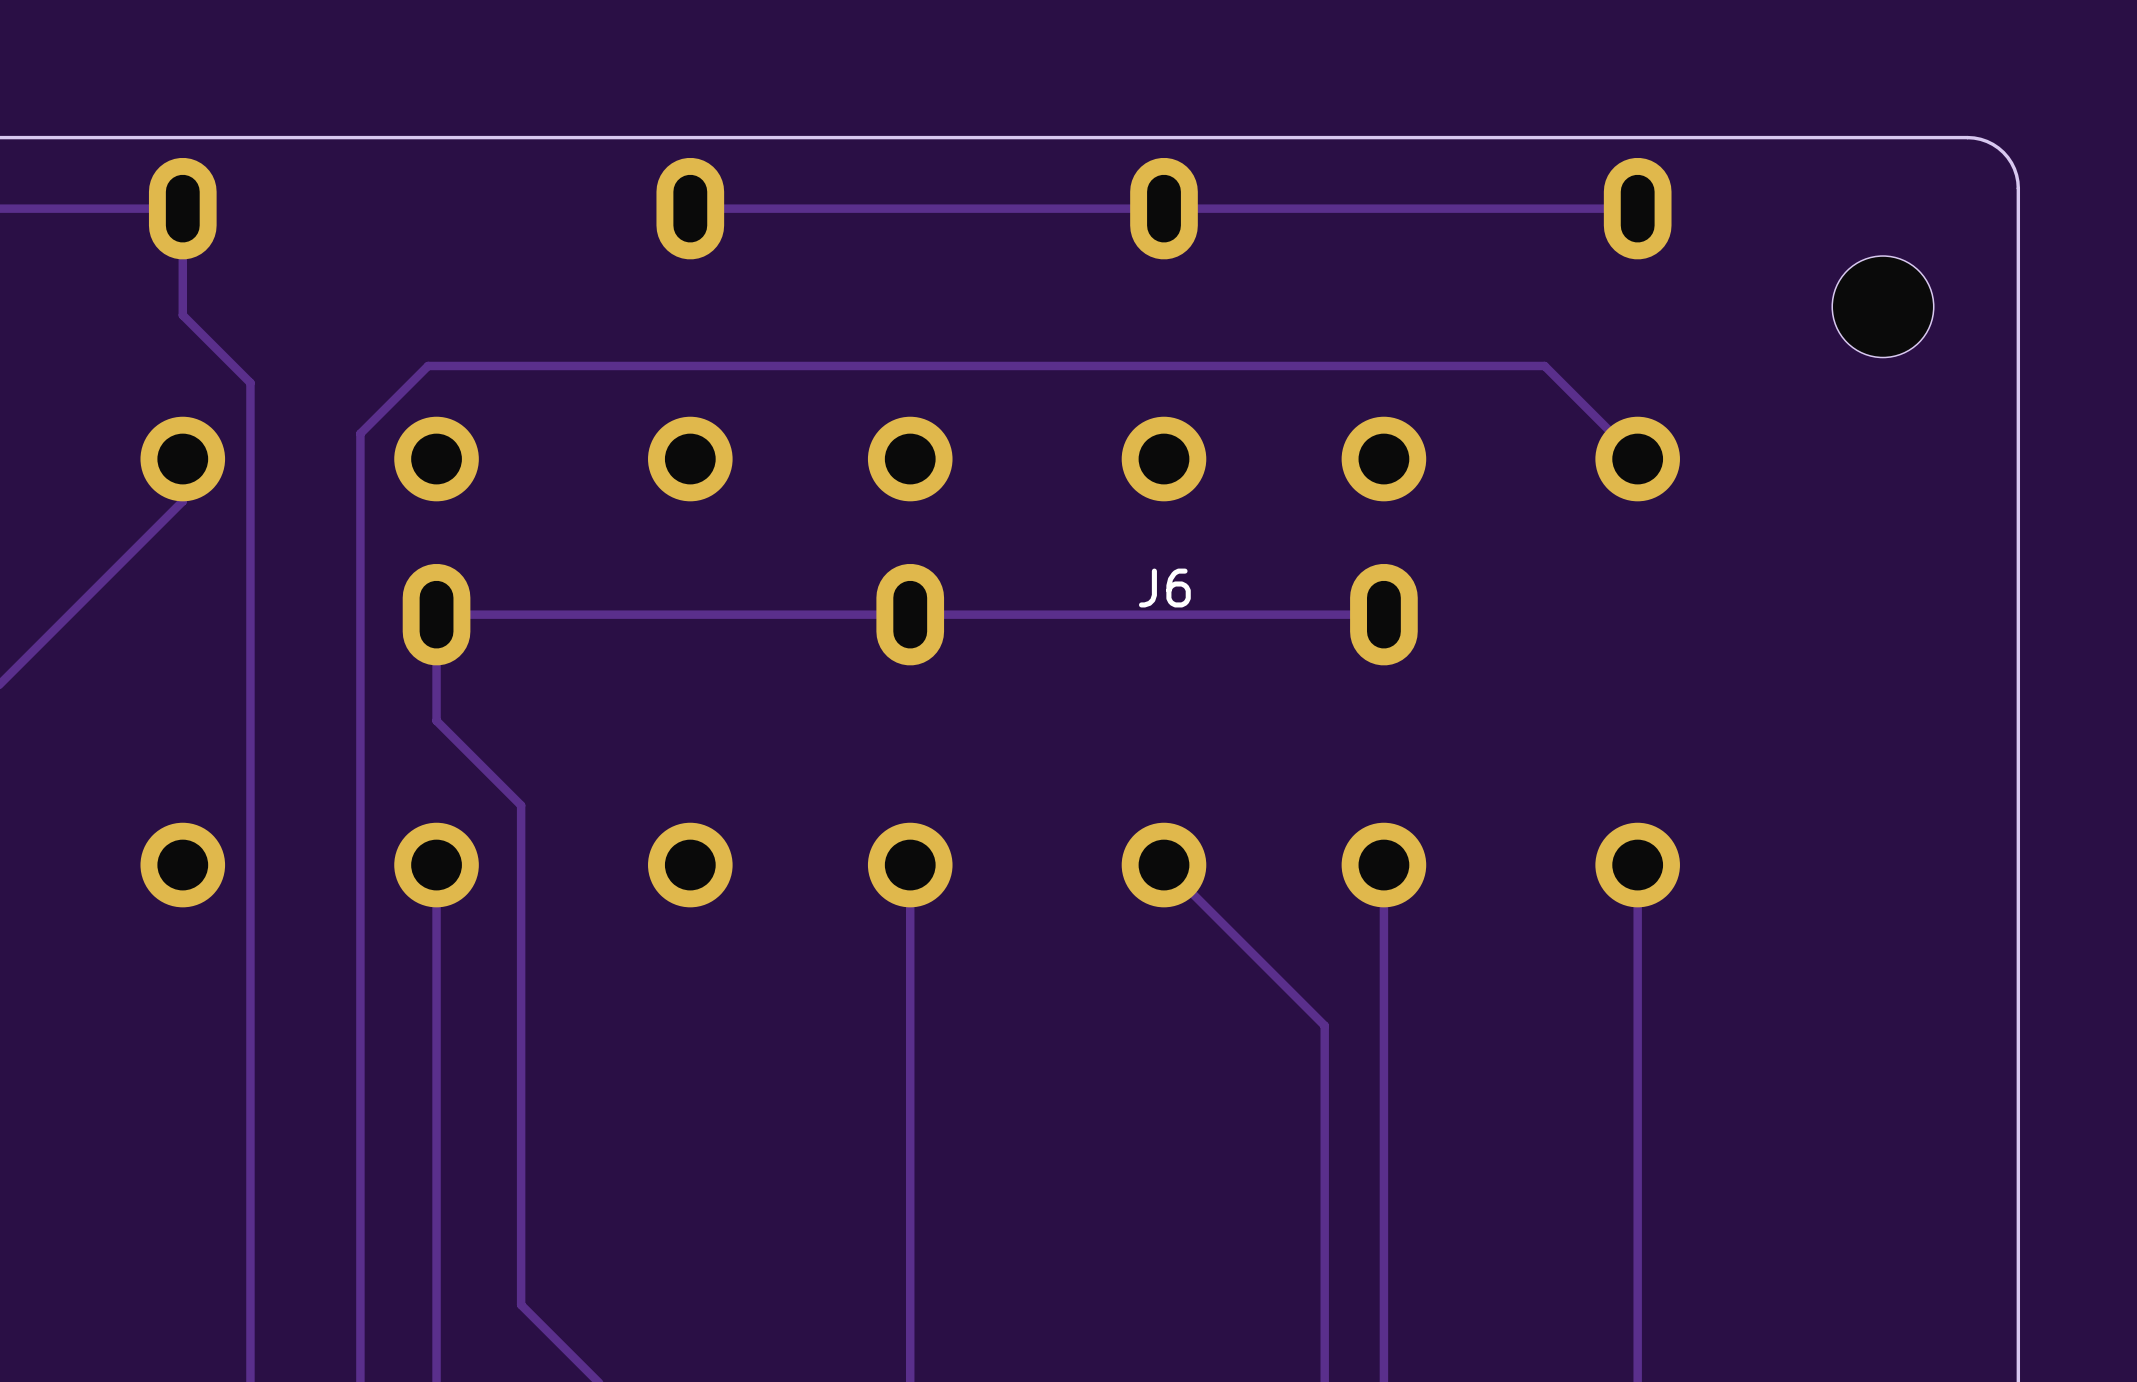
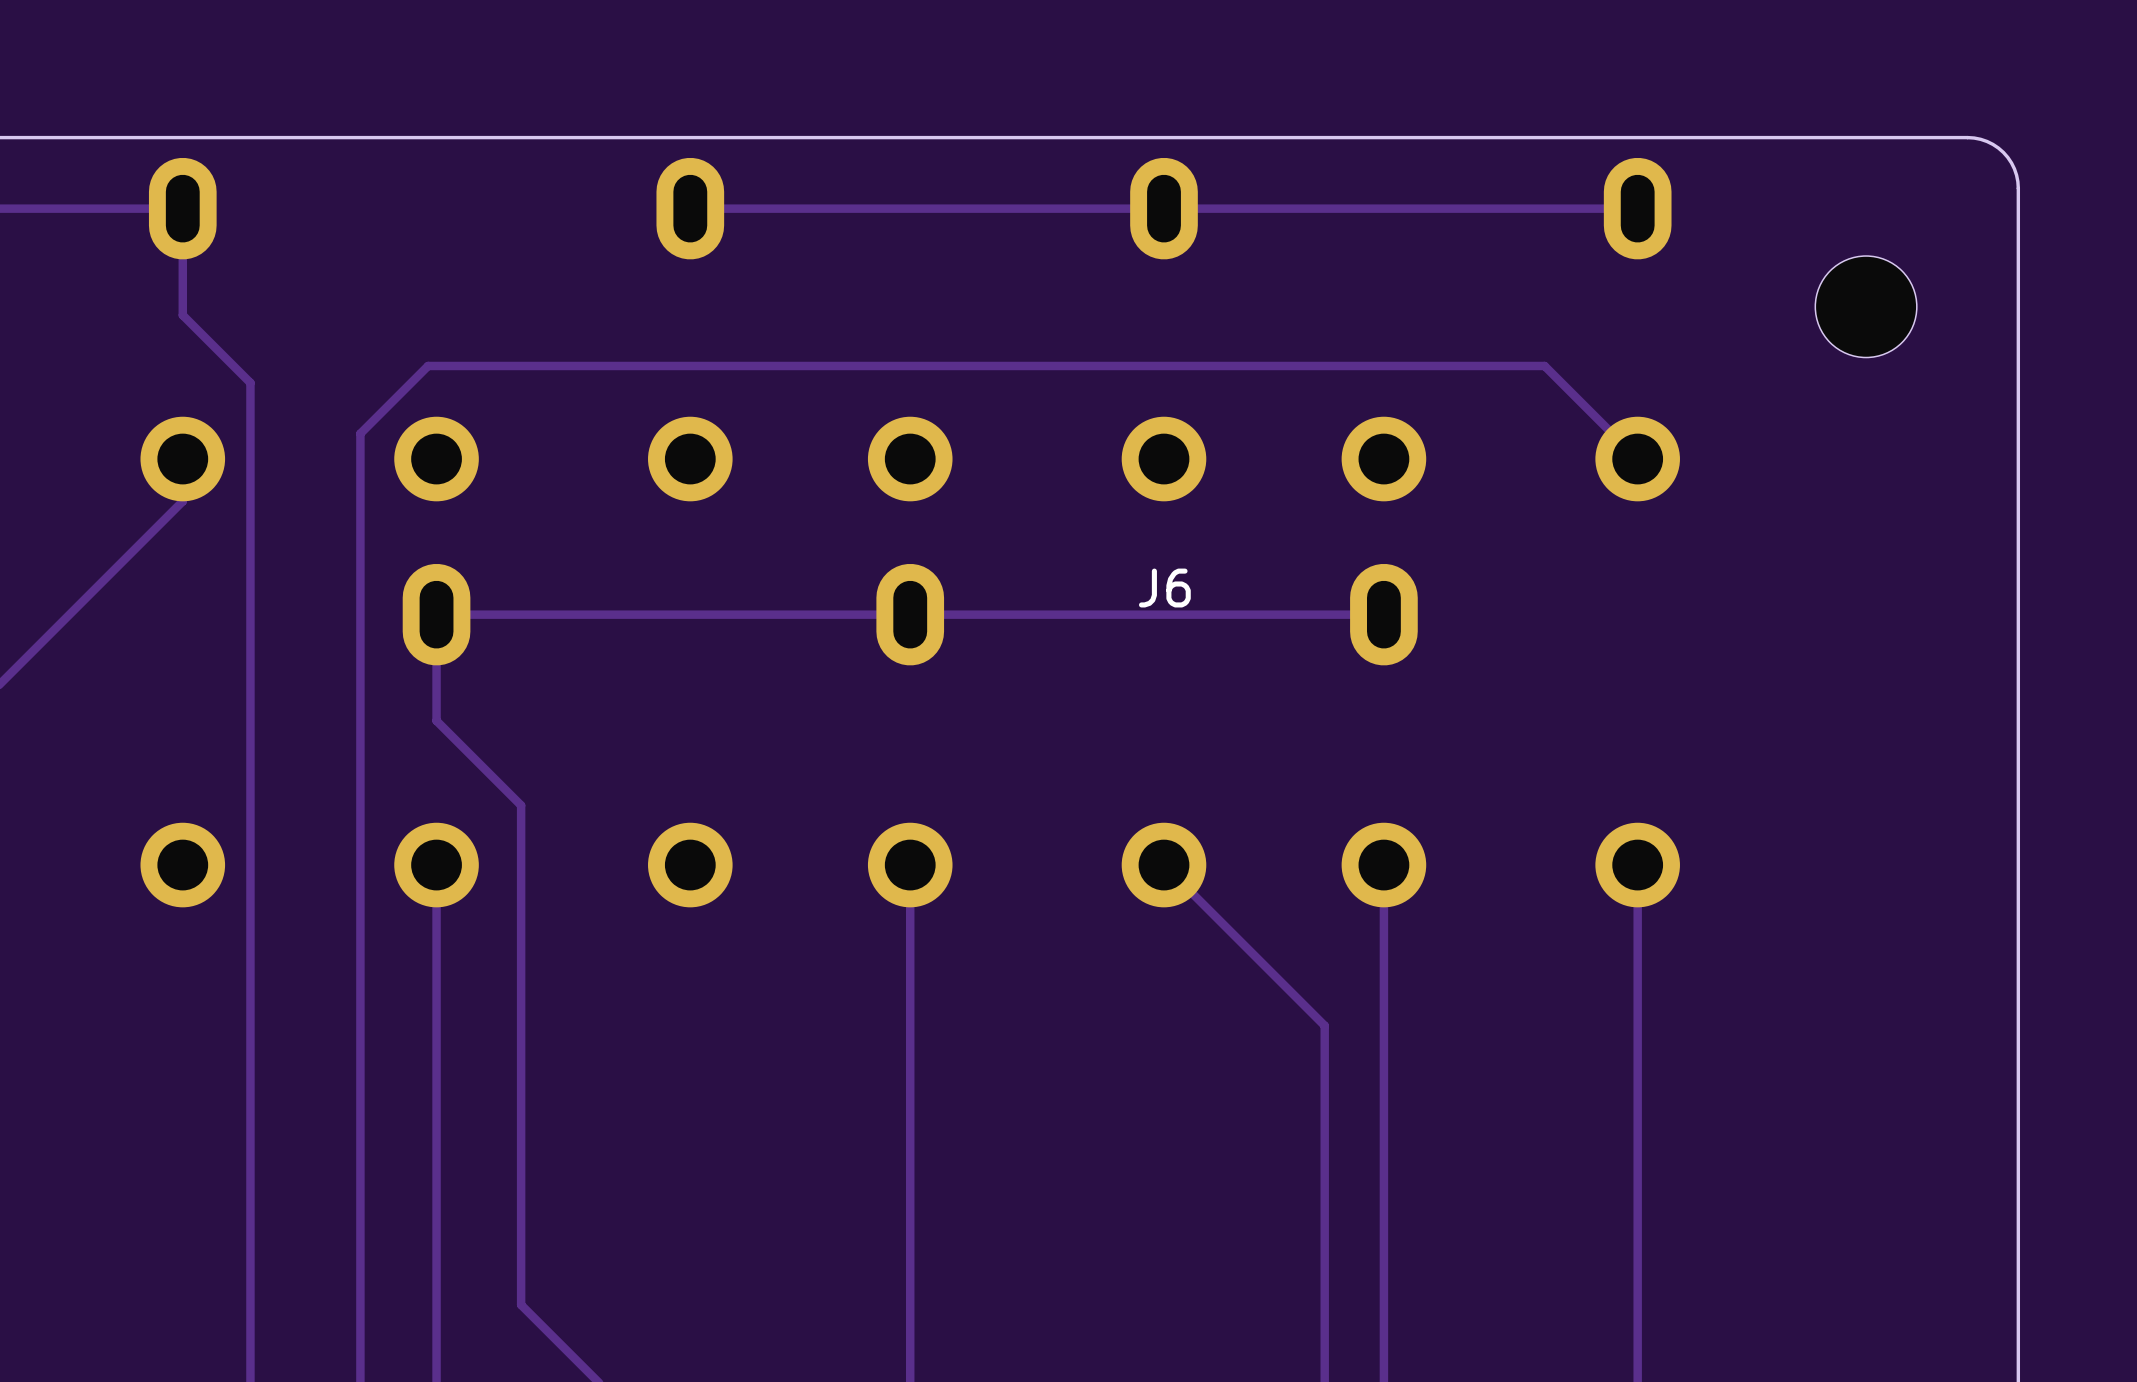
part position: (1882, 306) -> (1866, 306)

